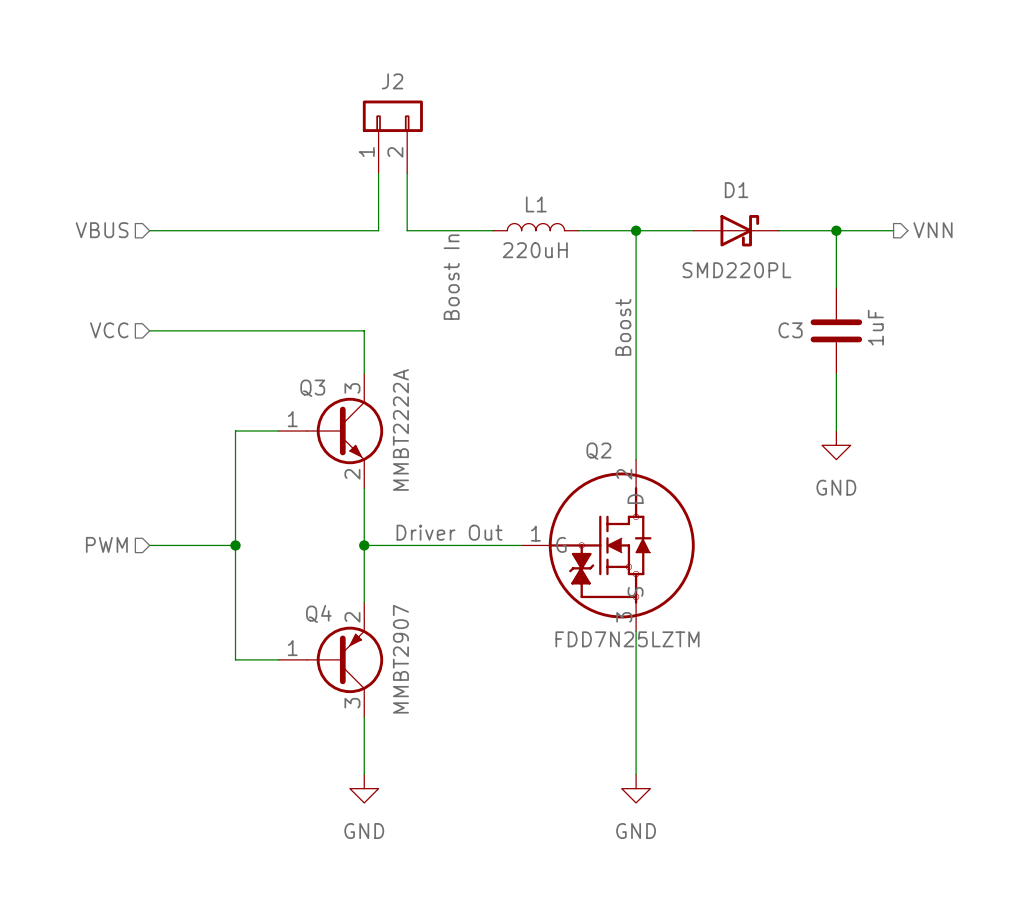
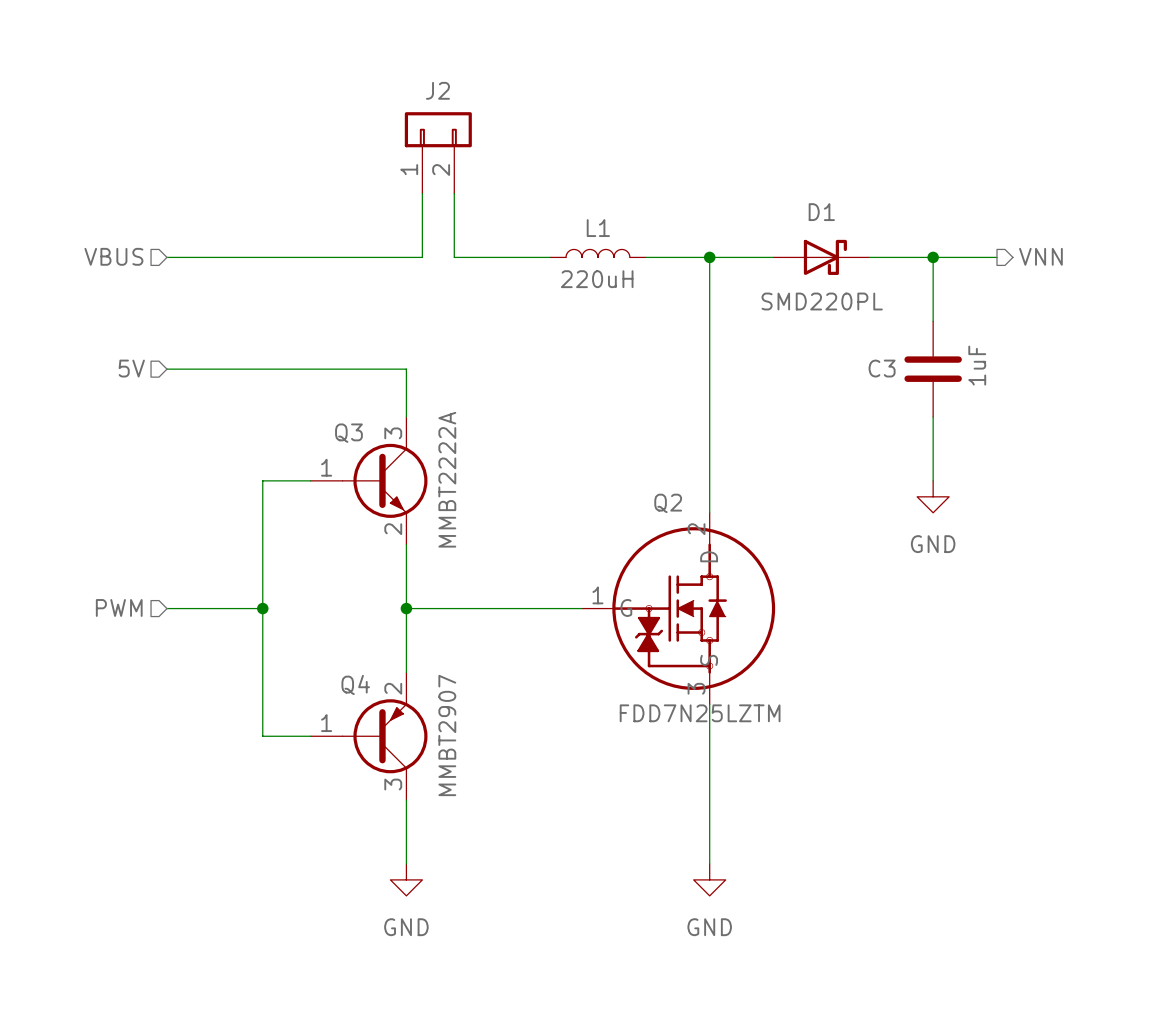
label: Boost In (451, 277) -> none
label: Boost (623, 327) -> none
hierarchical label: VCC (109, 330) -> 5V (131, 368)
label: Driver Out (449, 532) -> none

